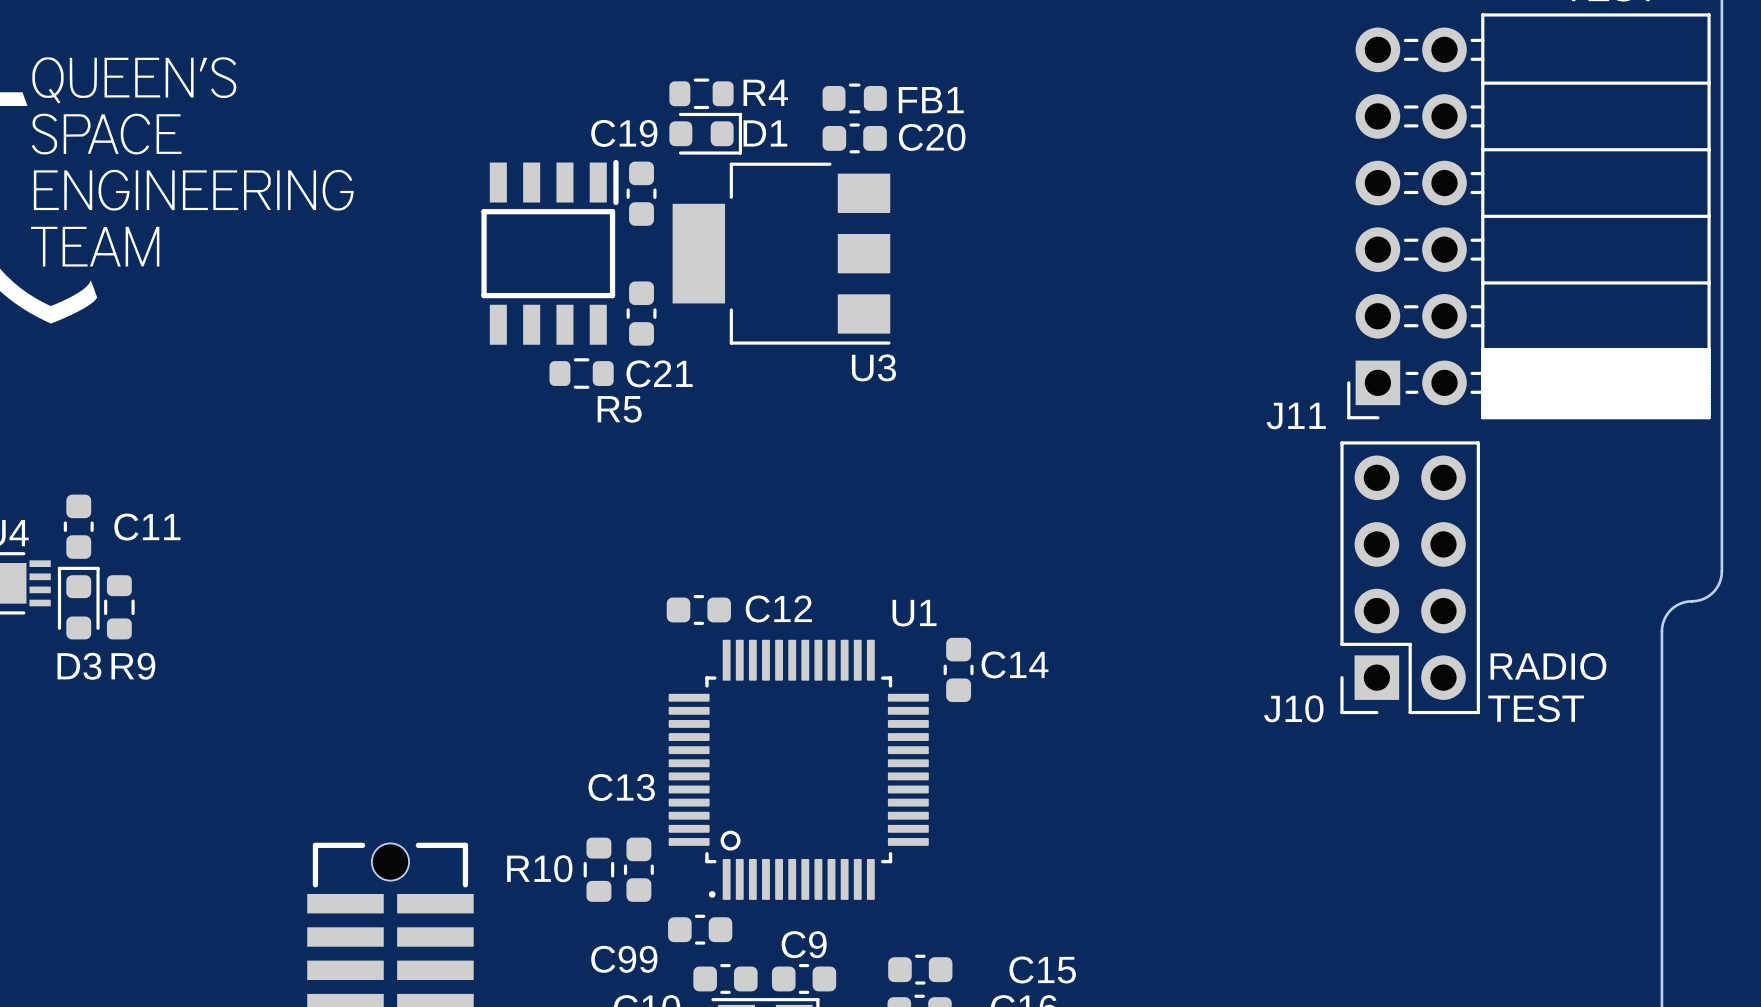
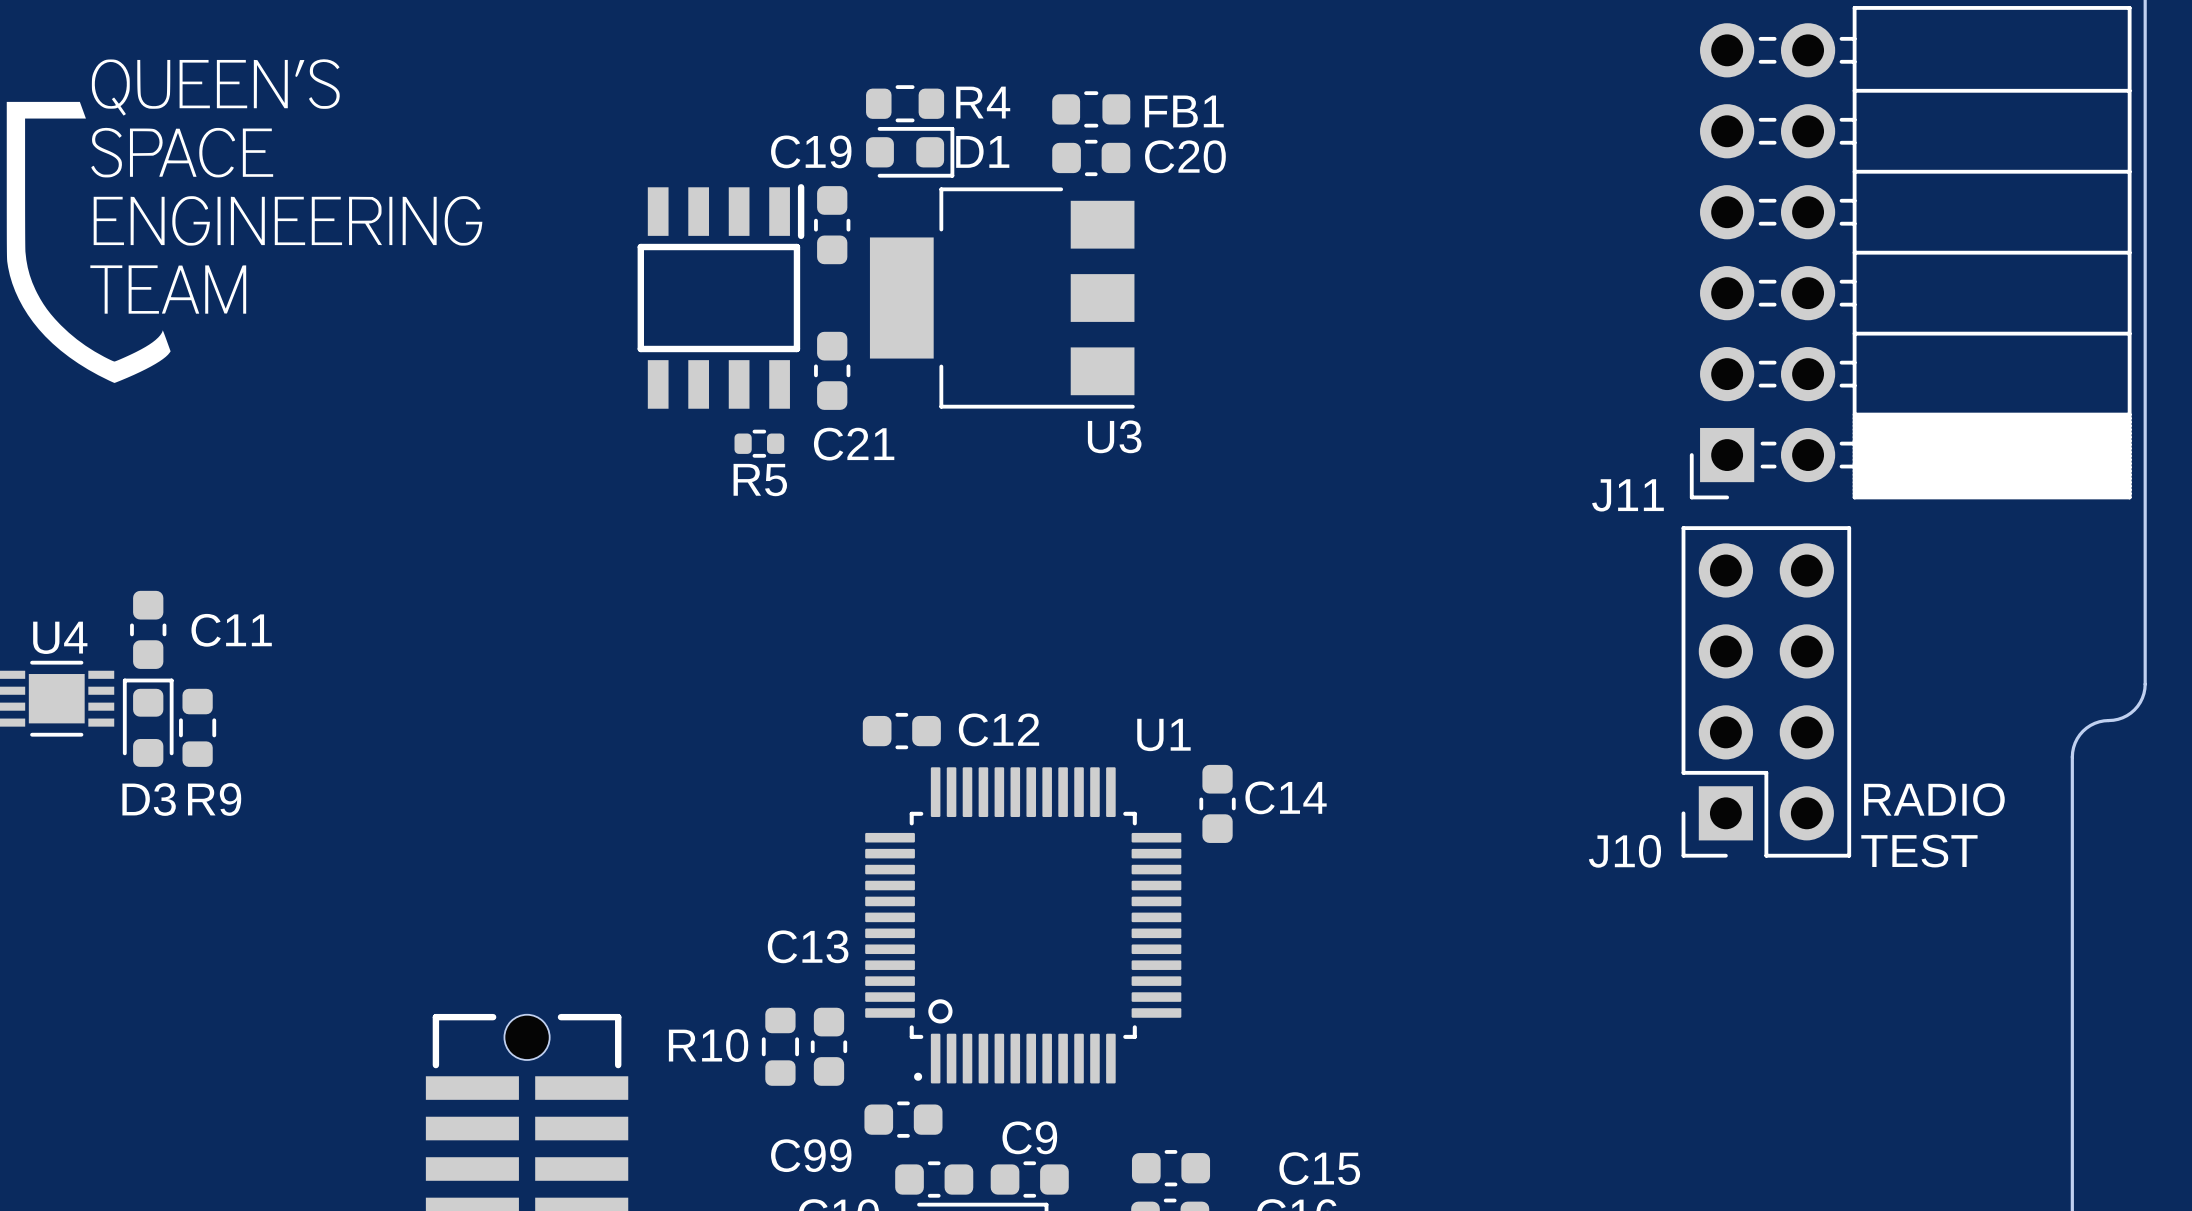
R5 footprint: [549, 358, 614, 389] -> [734, 429, 785, 458]
R5 name position: R5 (619, 409) -> R5 (760, 480)

